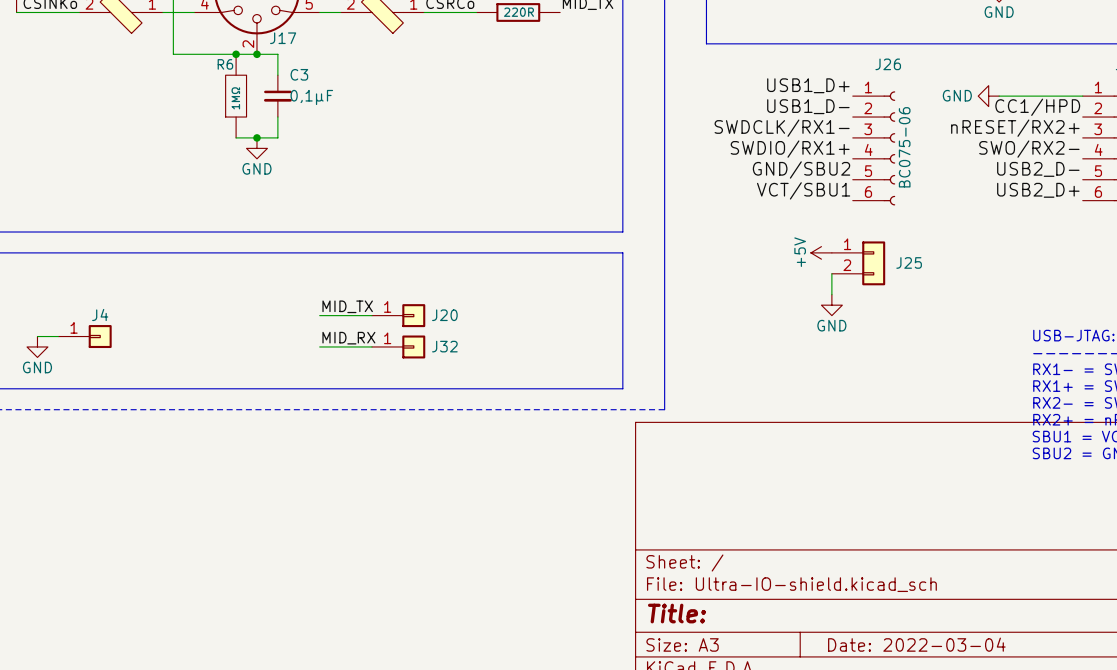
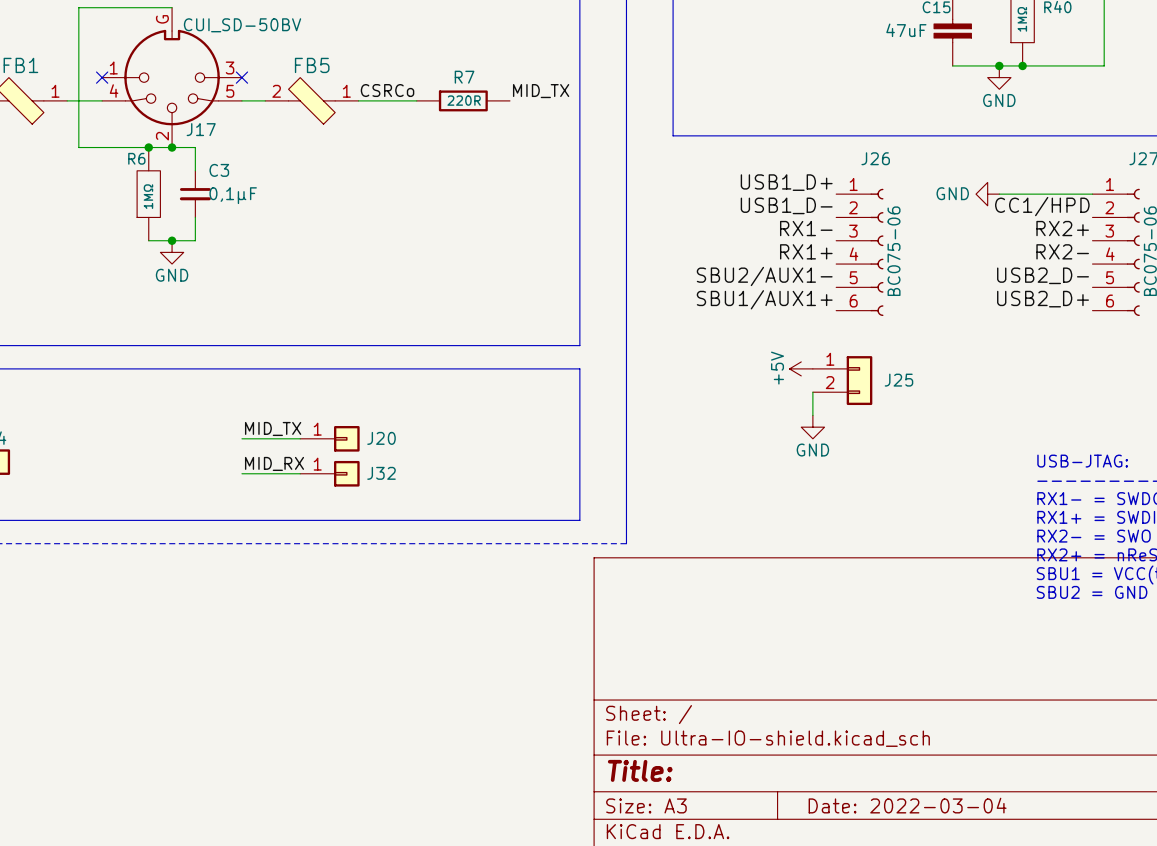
label: SWDCLK/RX1- (782, 128) -> RX1- (806, 228)
label: nRESET/RX2+ (1015, 128) -> RX2+ (1062, 228)
label: SWDIO/RX1+ (790, 149) -> RX1+ (806, 251)
label: SWO/RX2- (1029, 149) -> RX2- (1062, 251)
label: GND/SBU2 (801, 169) -> SBU2/AUX1- (764, 276)
label: VCT/SBU1 (803, 190) -> SBU1/AUX1+ (764, 299)

